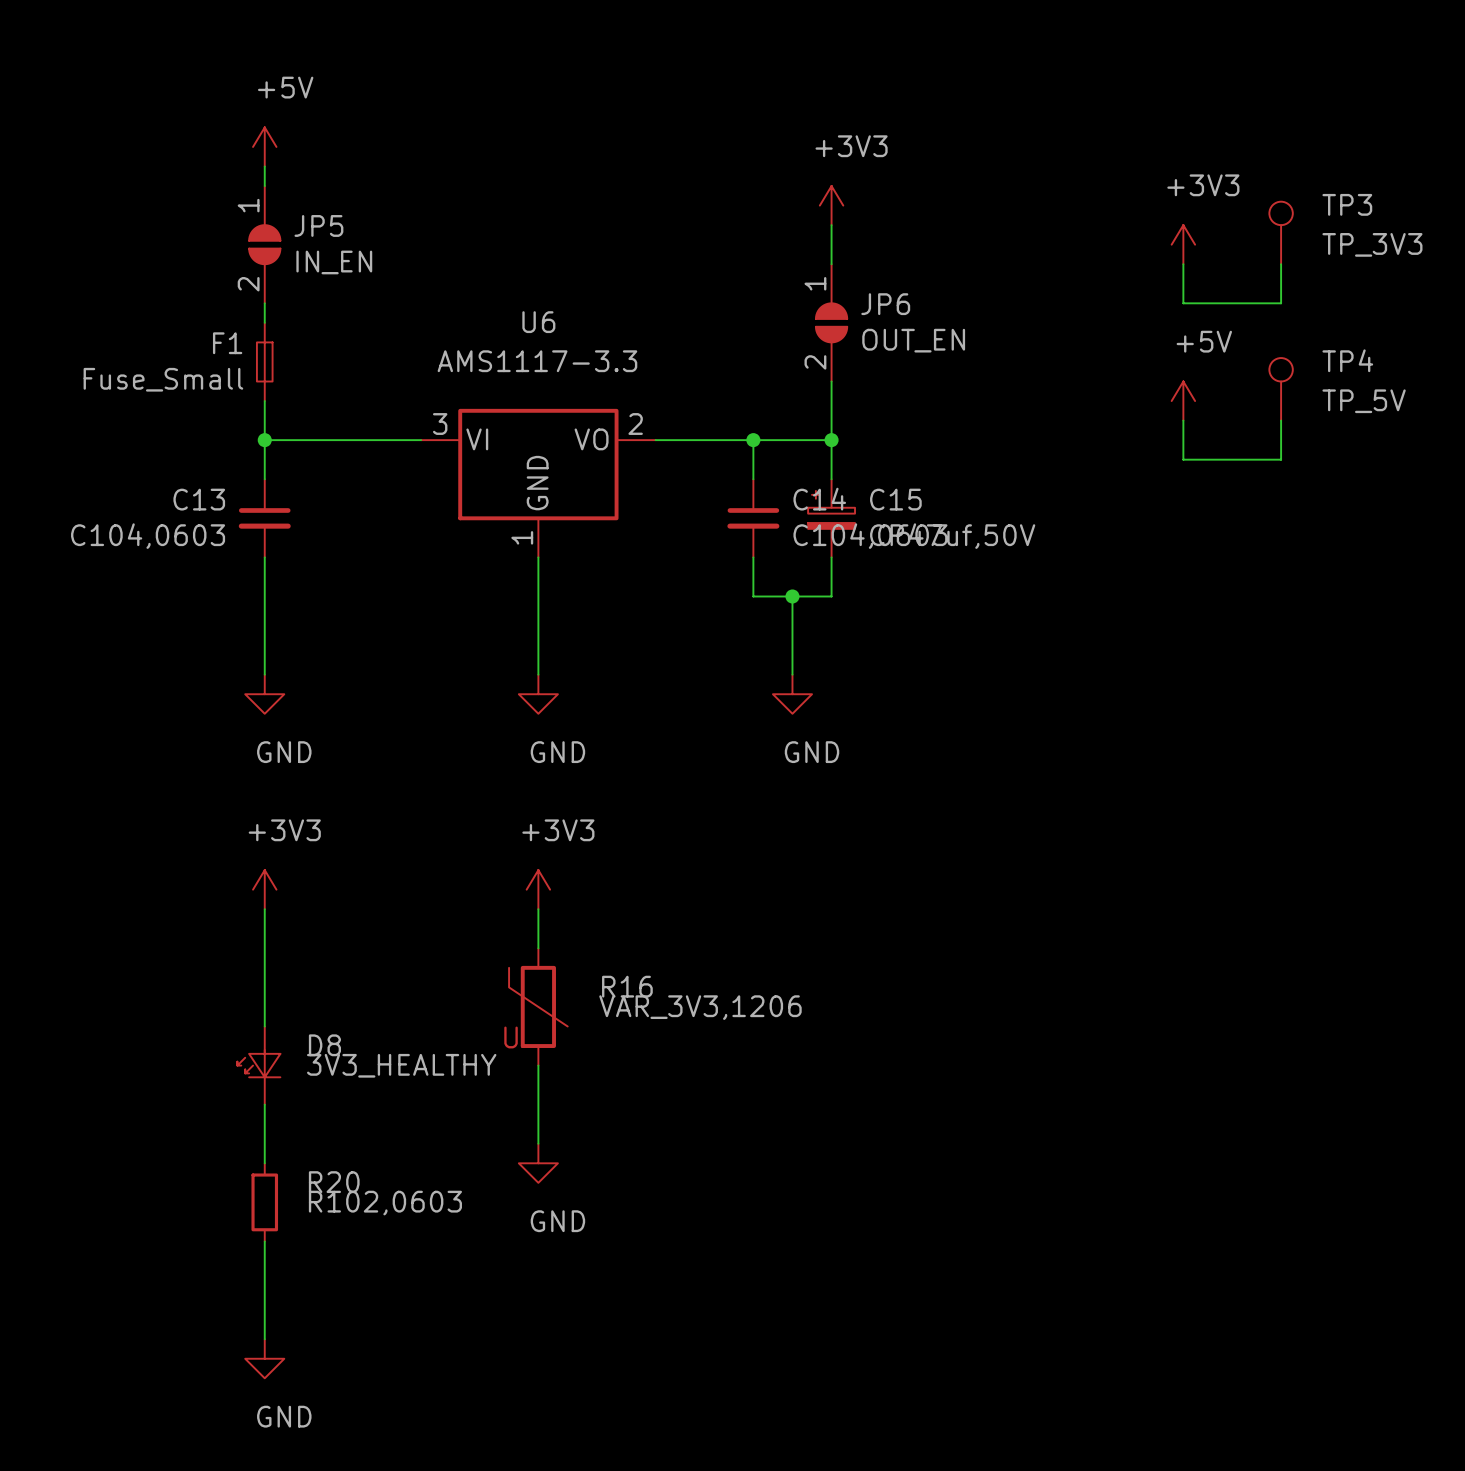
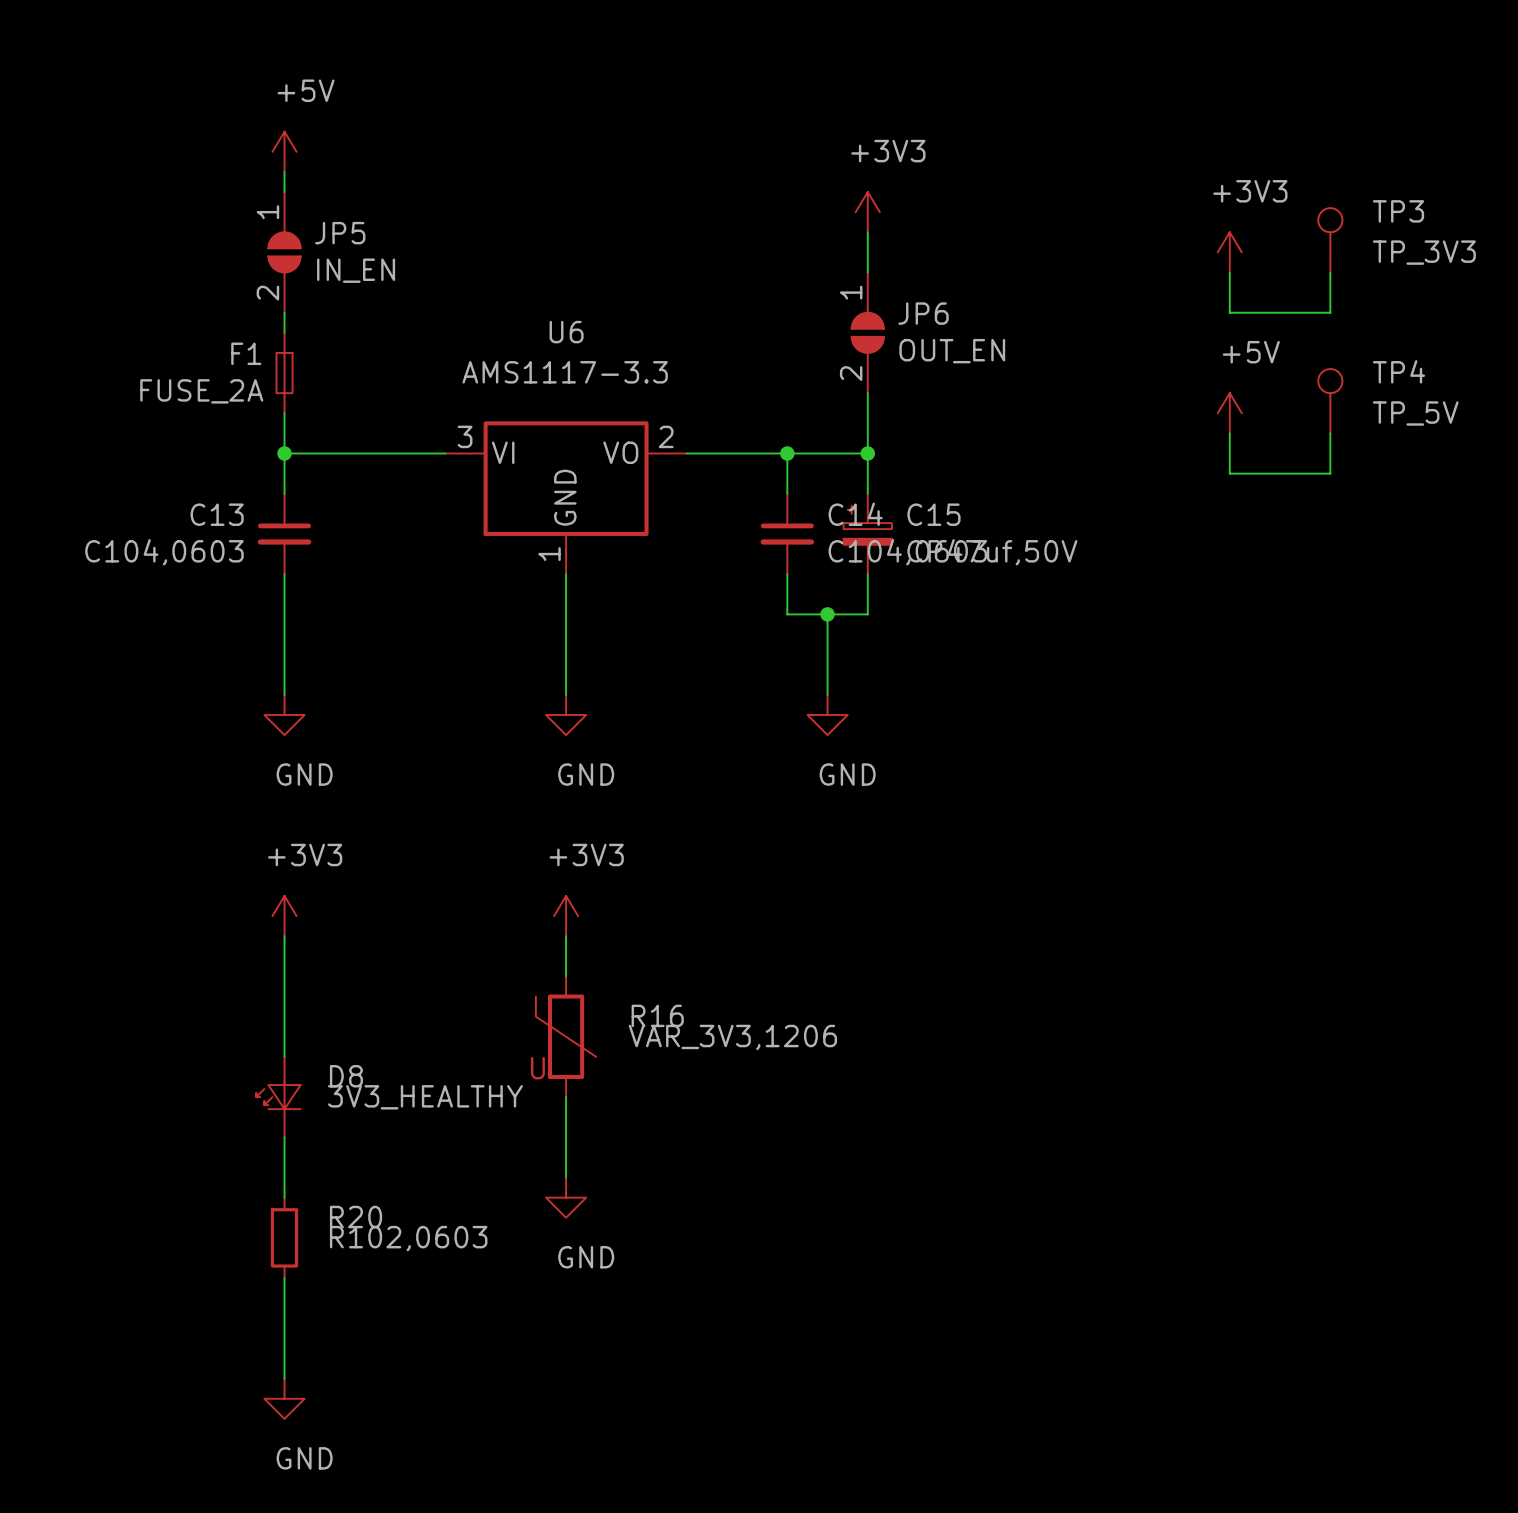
F1 value: Fuse_Small (163, 379) -> FUSE_2A (201, 391)

